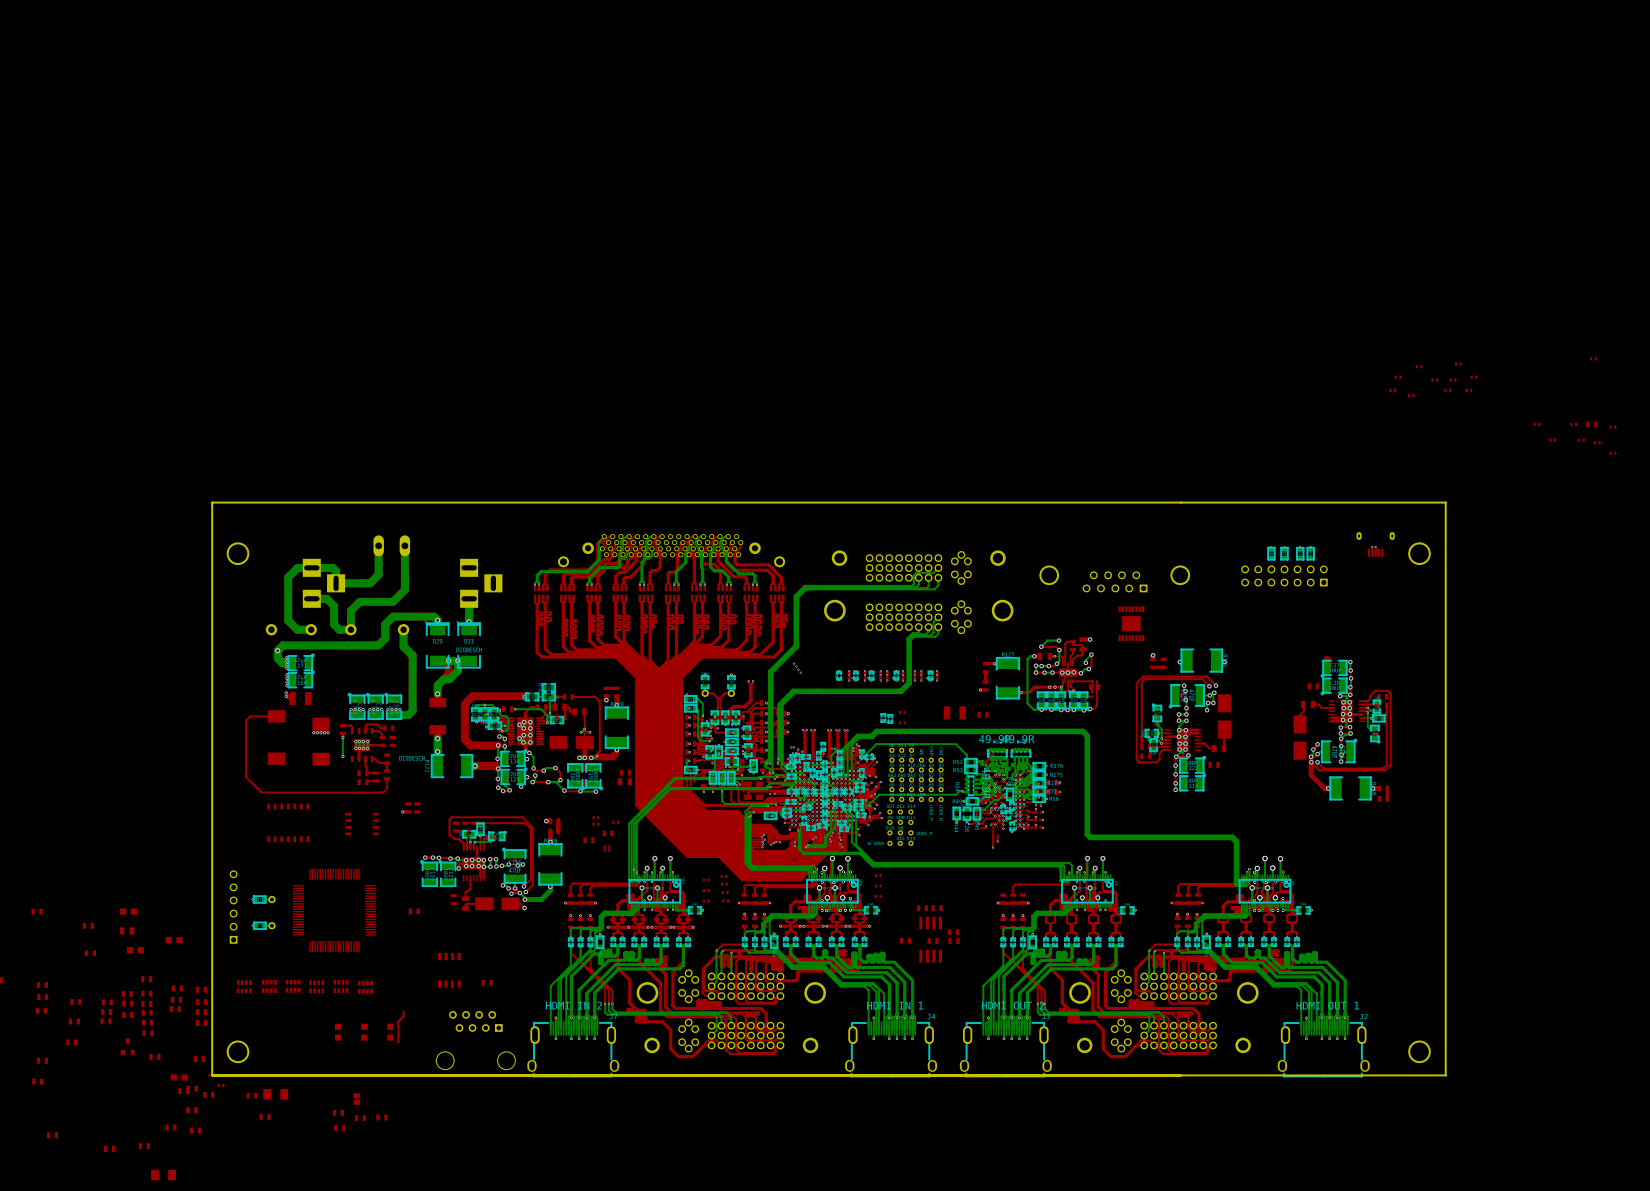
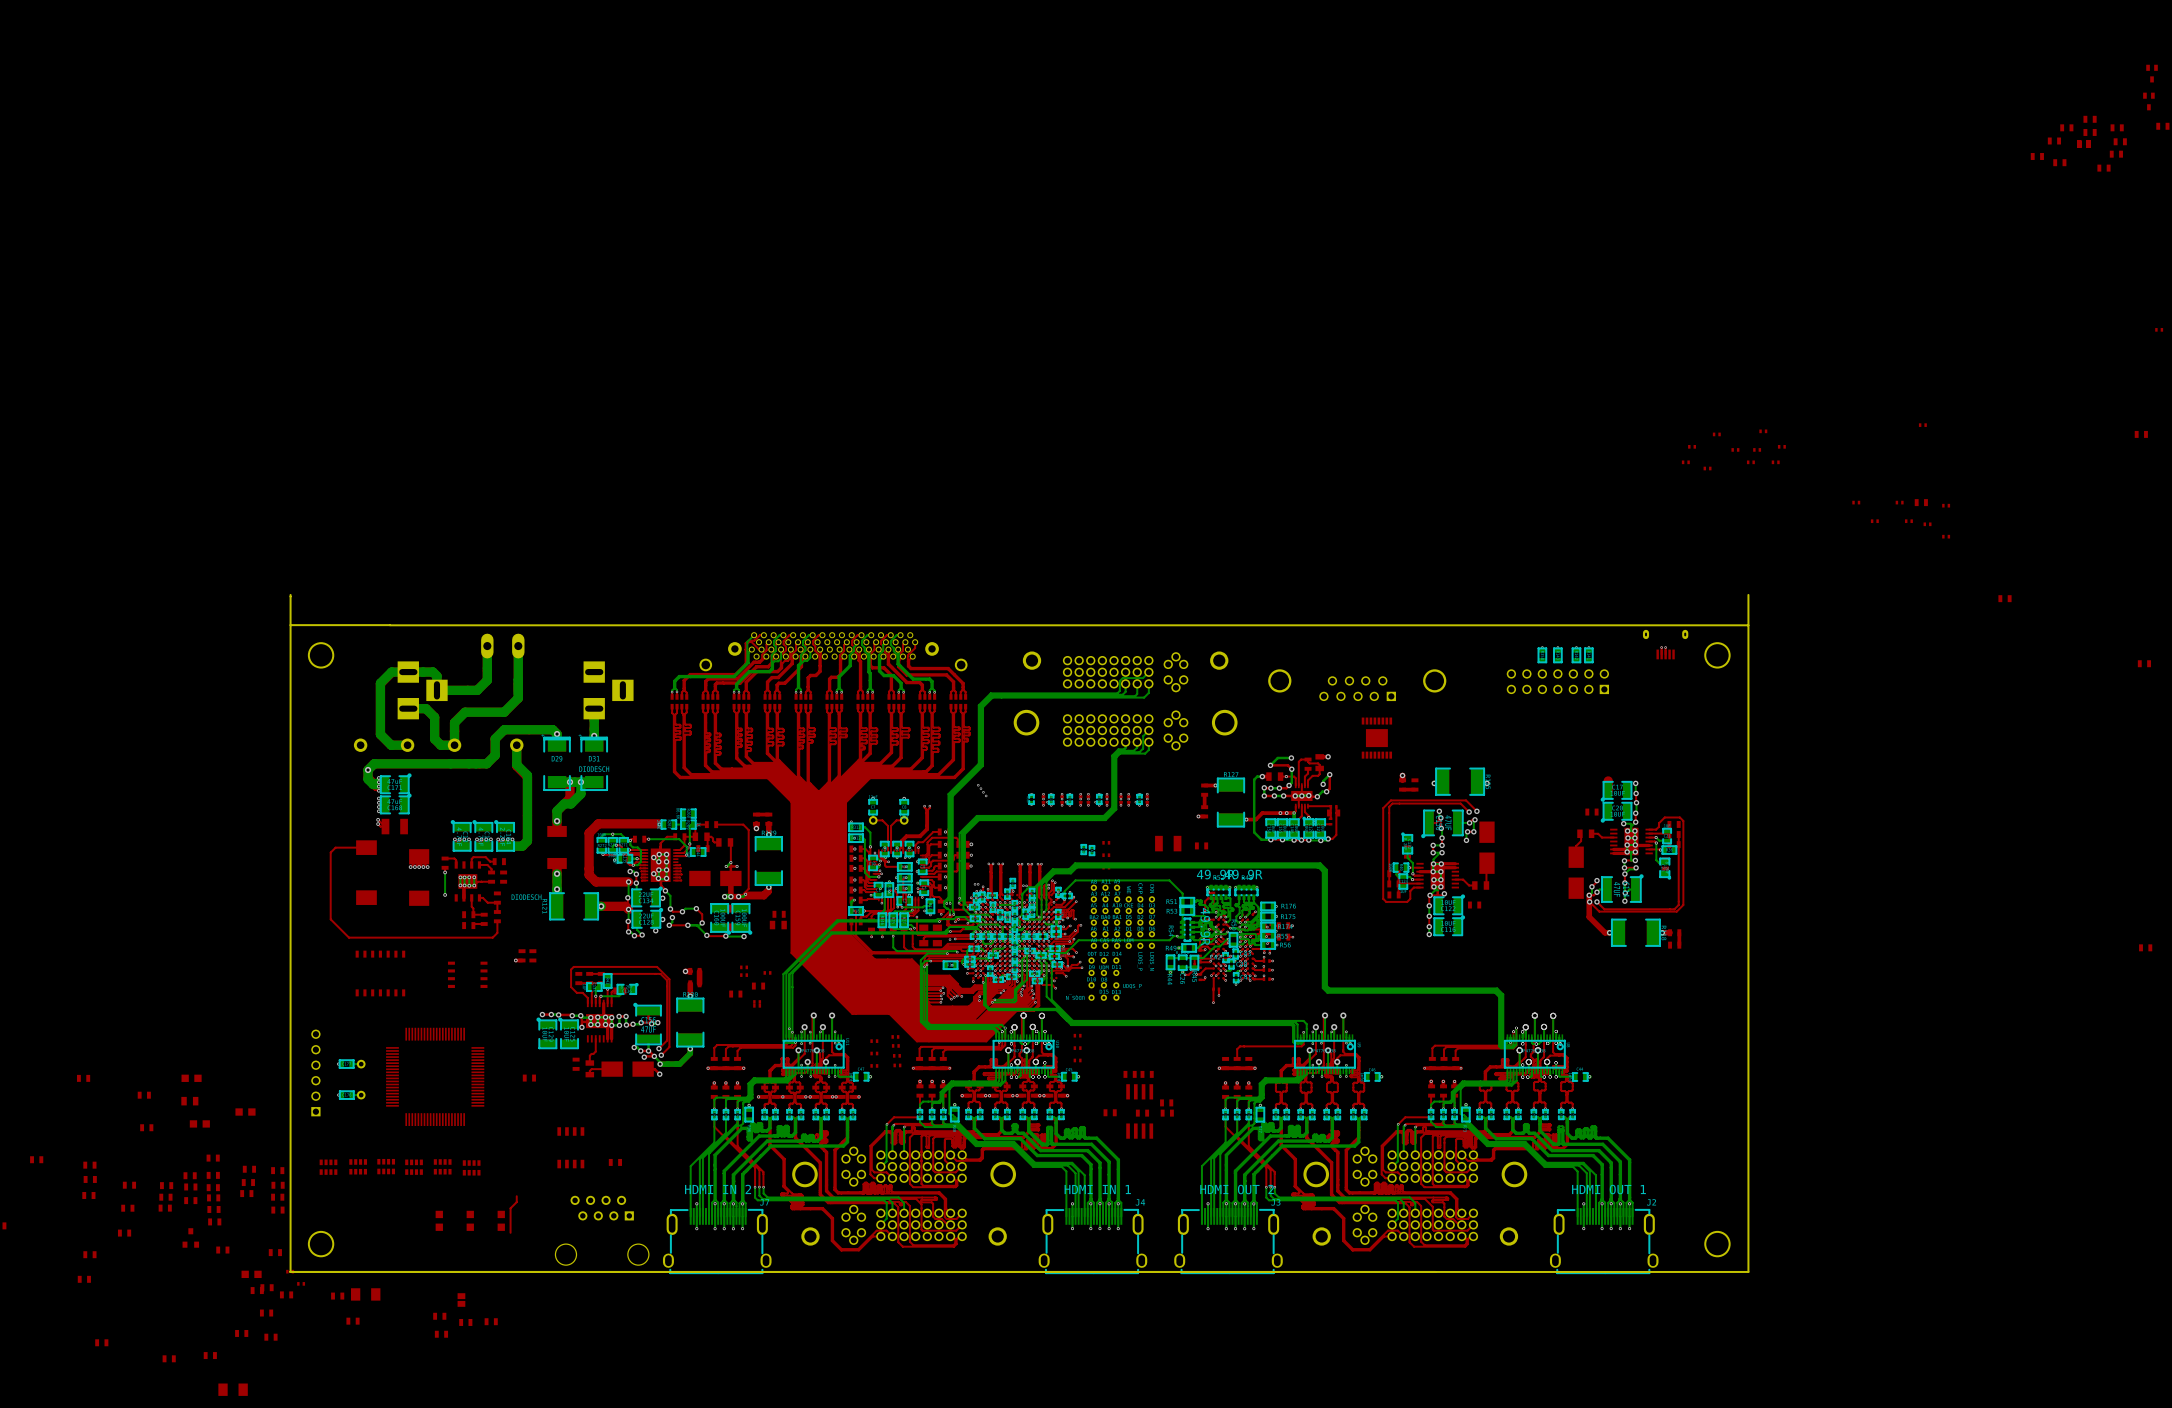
board edge: (1445, 502) (212, 502) -> none
board edge: none -> (389, 625) (290, 625)
board edge: none -> (1748, 625) (390, 625)

